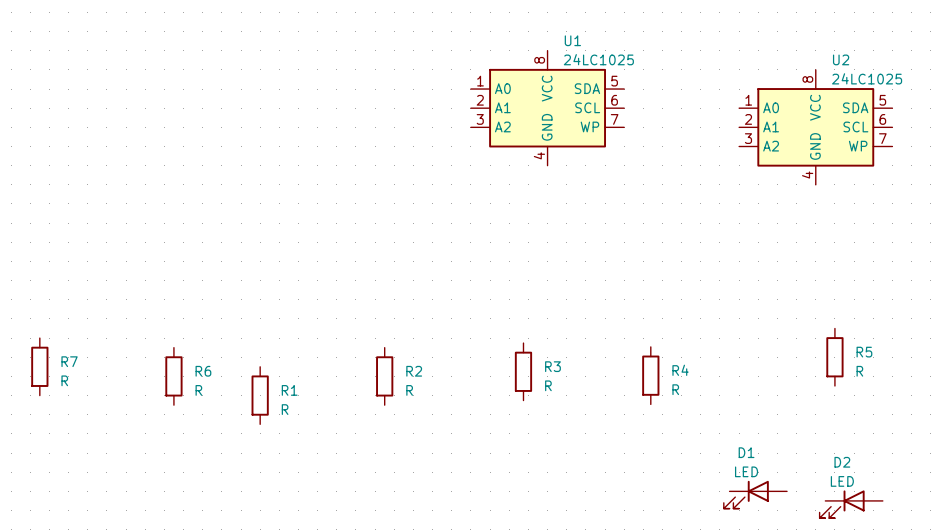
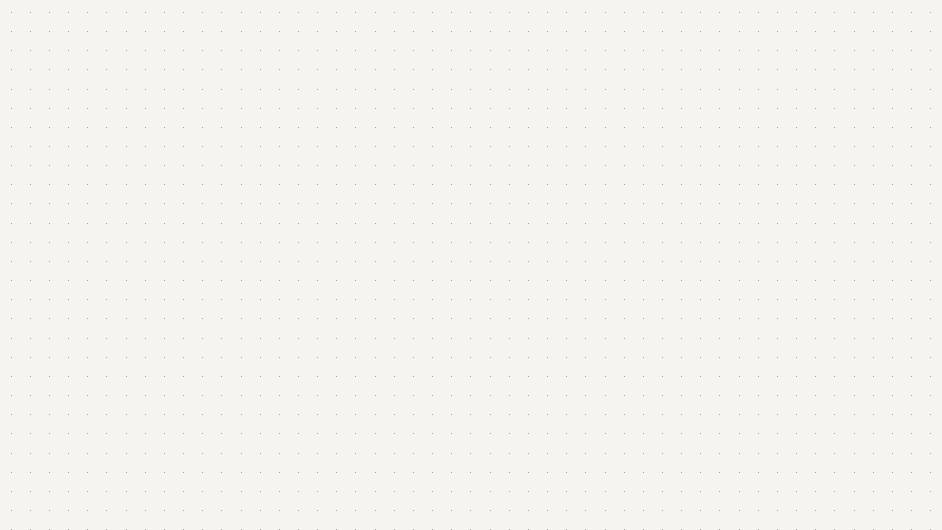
U1: 24LC1025 (547, 108) -> none
U2: 24LC1025 (815, 127) -> none
R5: R (834, 357) -> none
R7: R (39, 366) -> none
R3: R (523, 371) -> none
R4: R (650, 375) -> none
R6: R (173, 376) -> none
R2: R (384, 376) -> none
R1: R (260, 395) -> none
D1: LED (755, 494) -> none
D2: LED (851, 504) -> none

